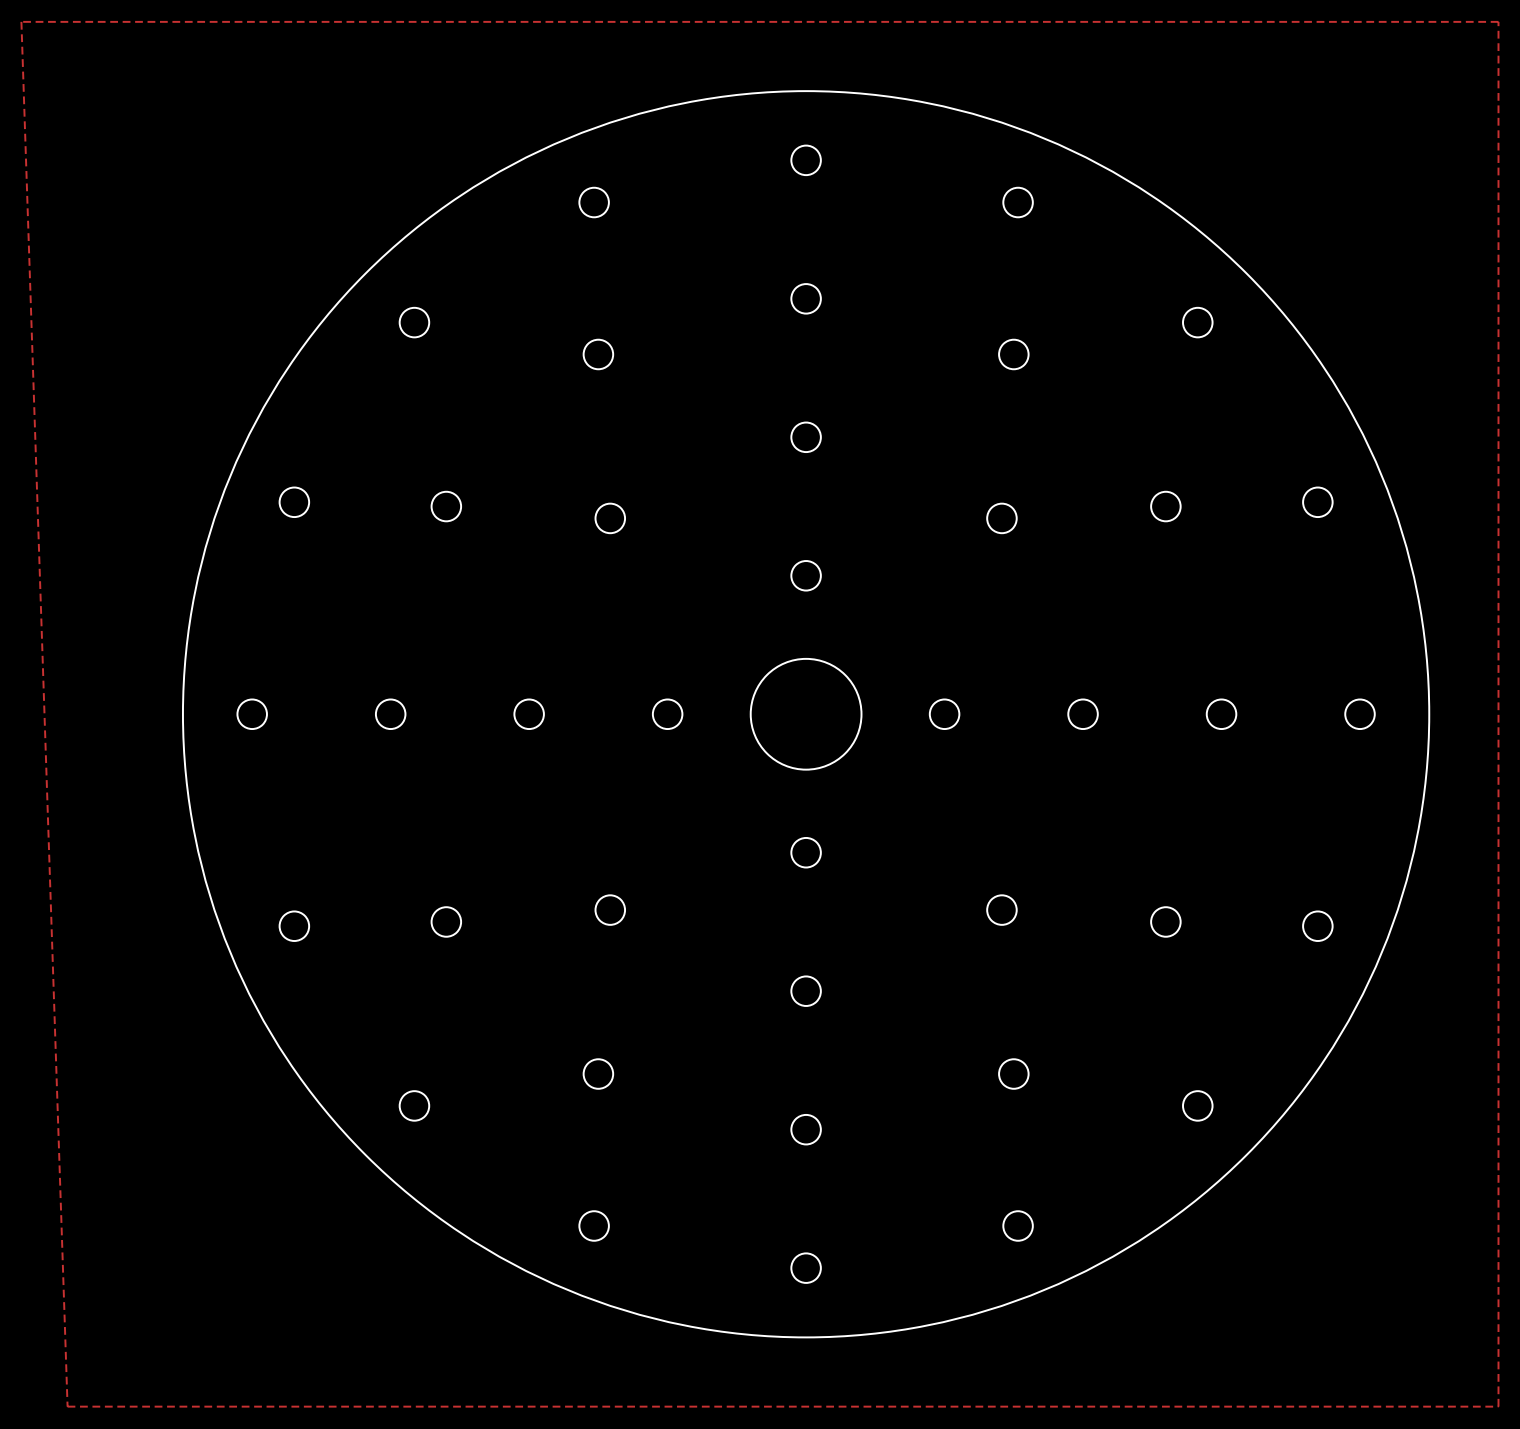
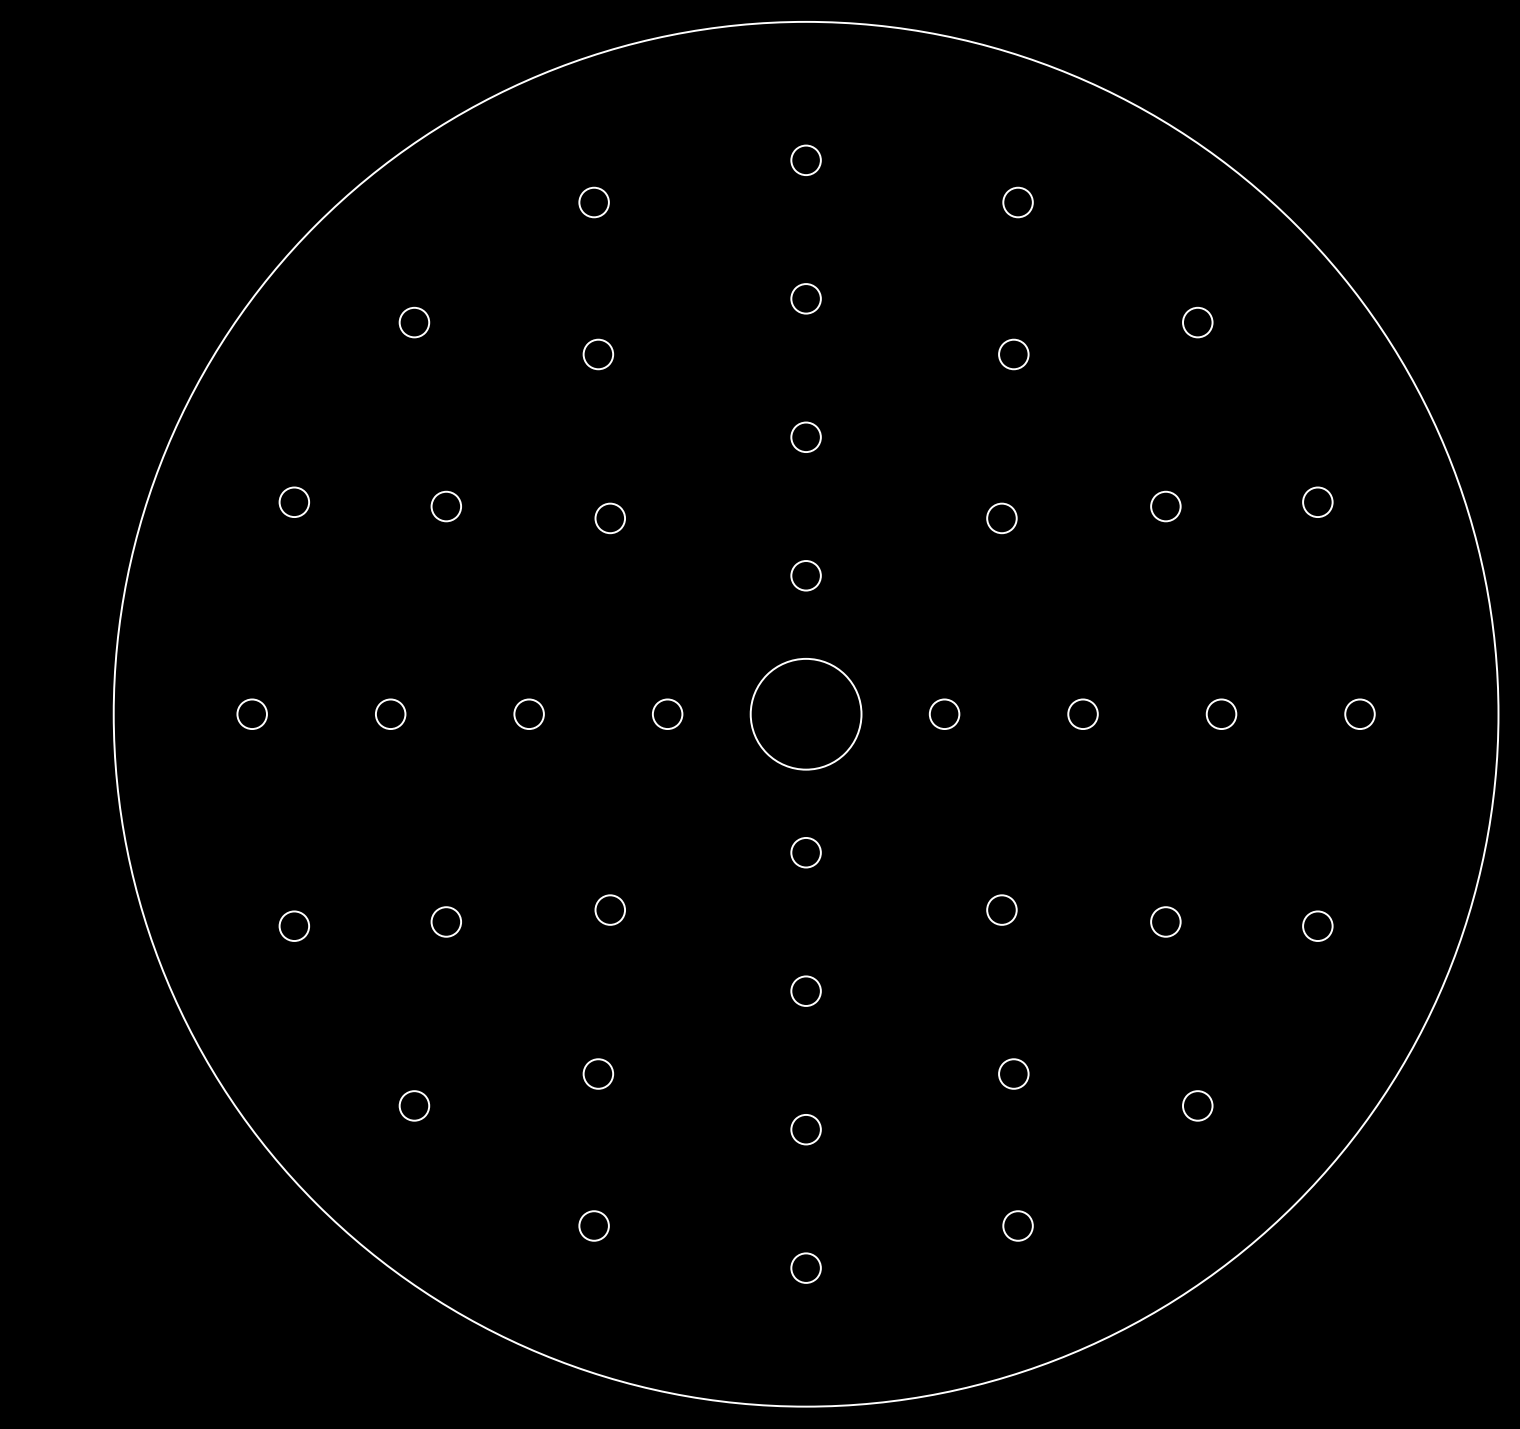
top zone outline: (1498, 21) (21, 21) (67, 1406) (1498, 1406) (1498, 21) -> none
round board edge size: [182, 90, 1430, 1338] -> [113, 21, 1499, 1408]

